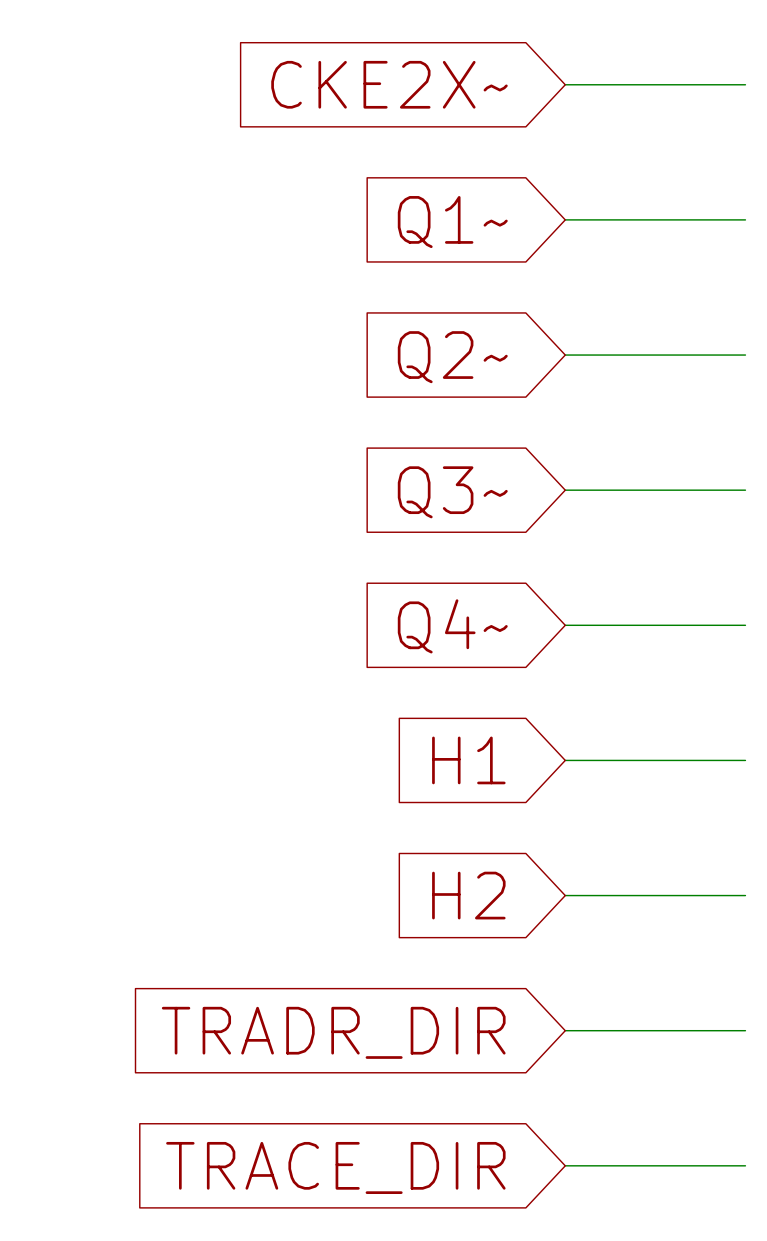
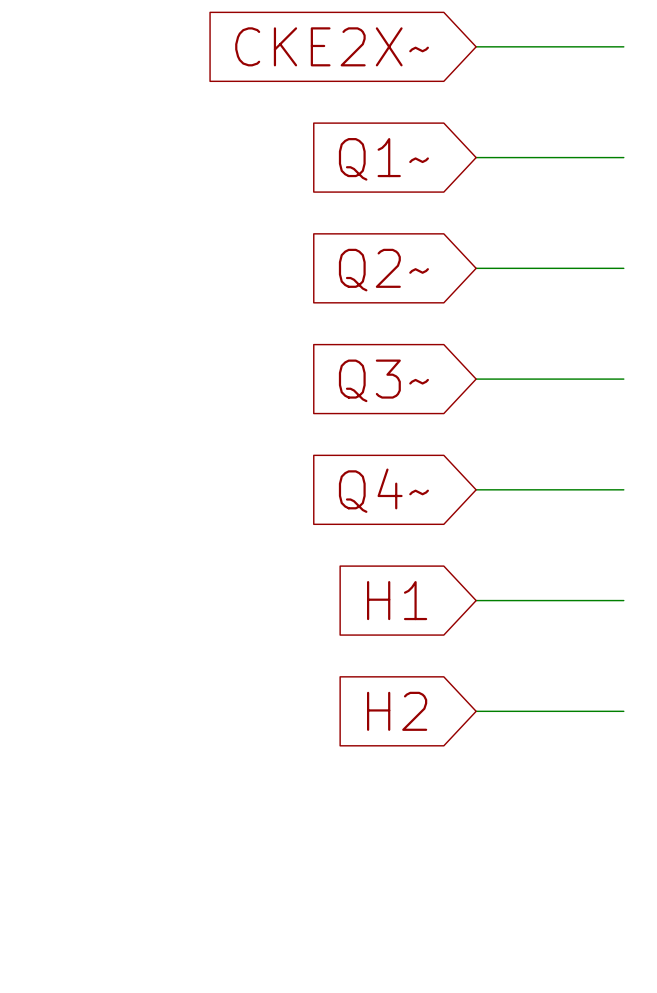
wire: (565, 1030) (745, 1030) -> none
global label: TRADR_DIR (333, 1032) -> none
wire: (565, 1165) (745, 1165) -> none
global label: TRACE_DIR (335, 1167) -> none

